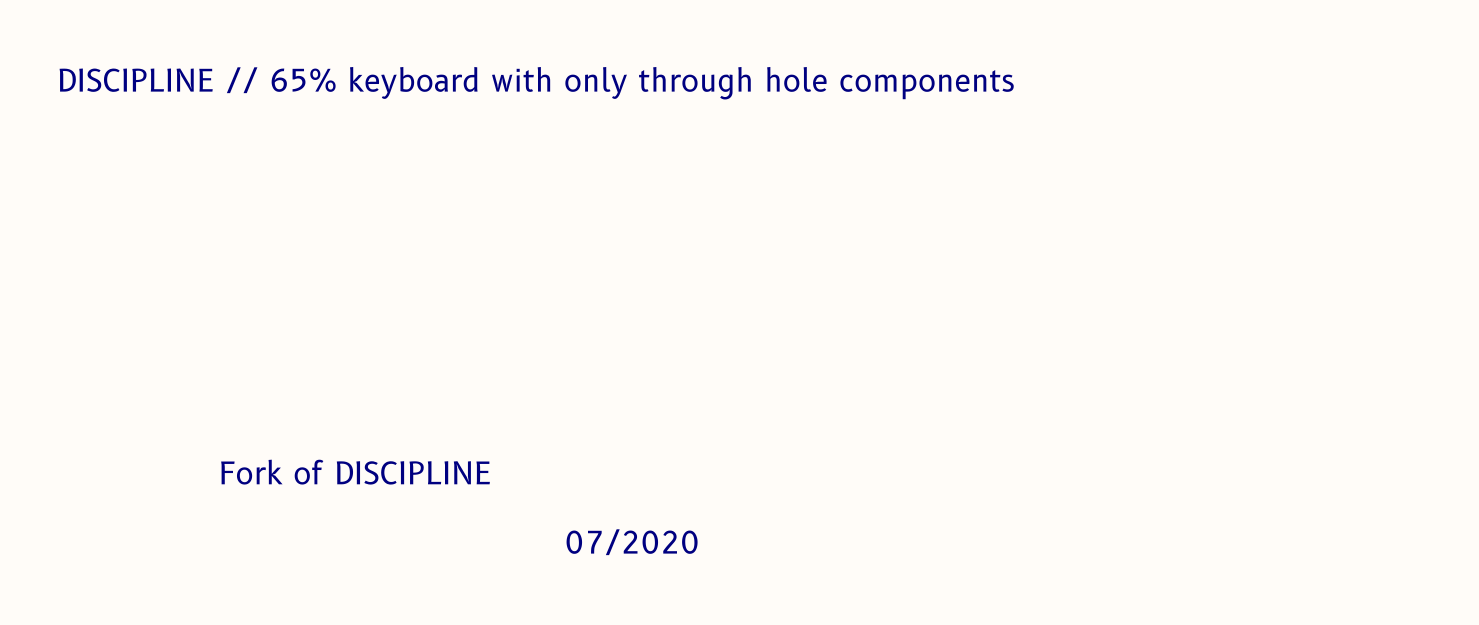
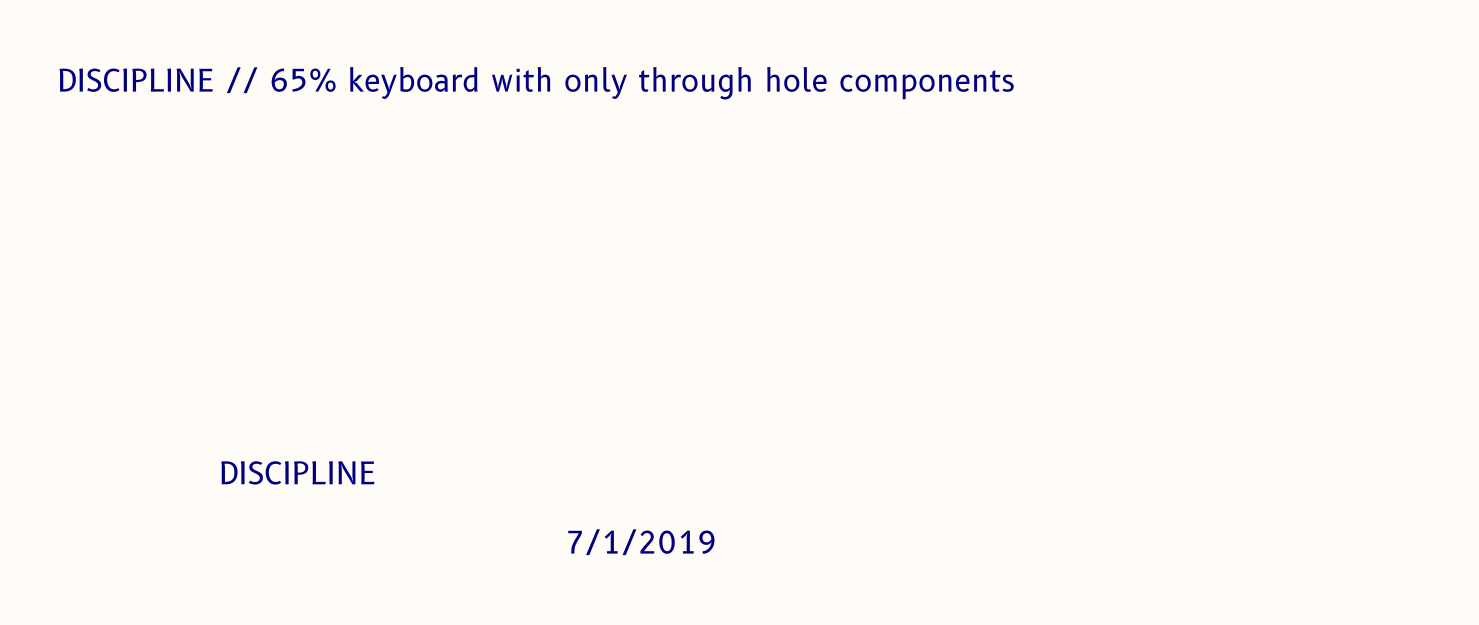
text: Fork of DISCIPLINE (355, 472) -> DISCIPLINE (297, 472)
text: 07/2020 (632, 542) -> 7/1/2019 (641, 542)

